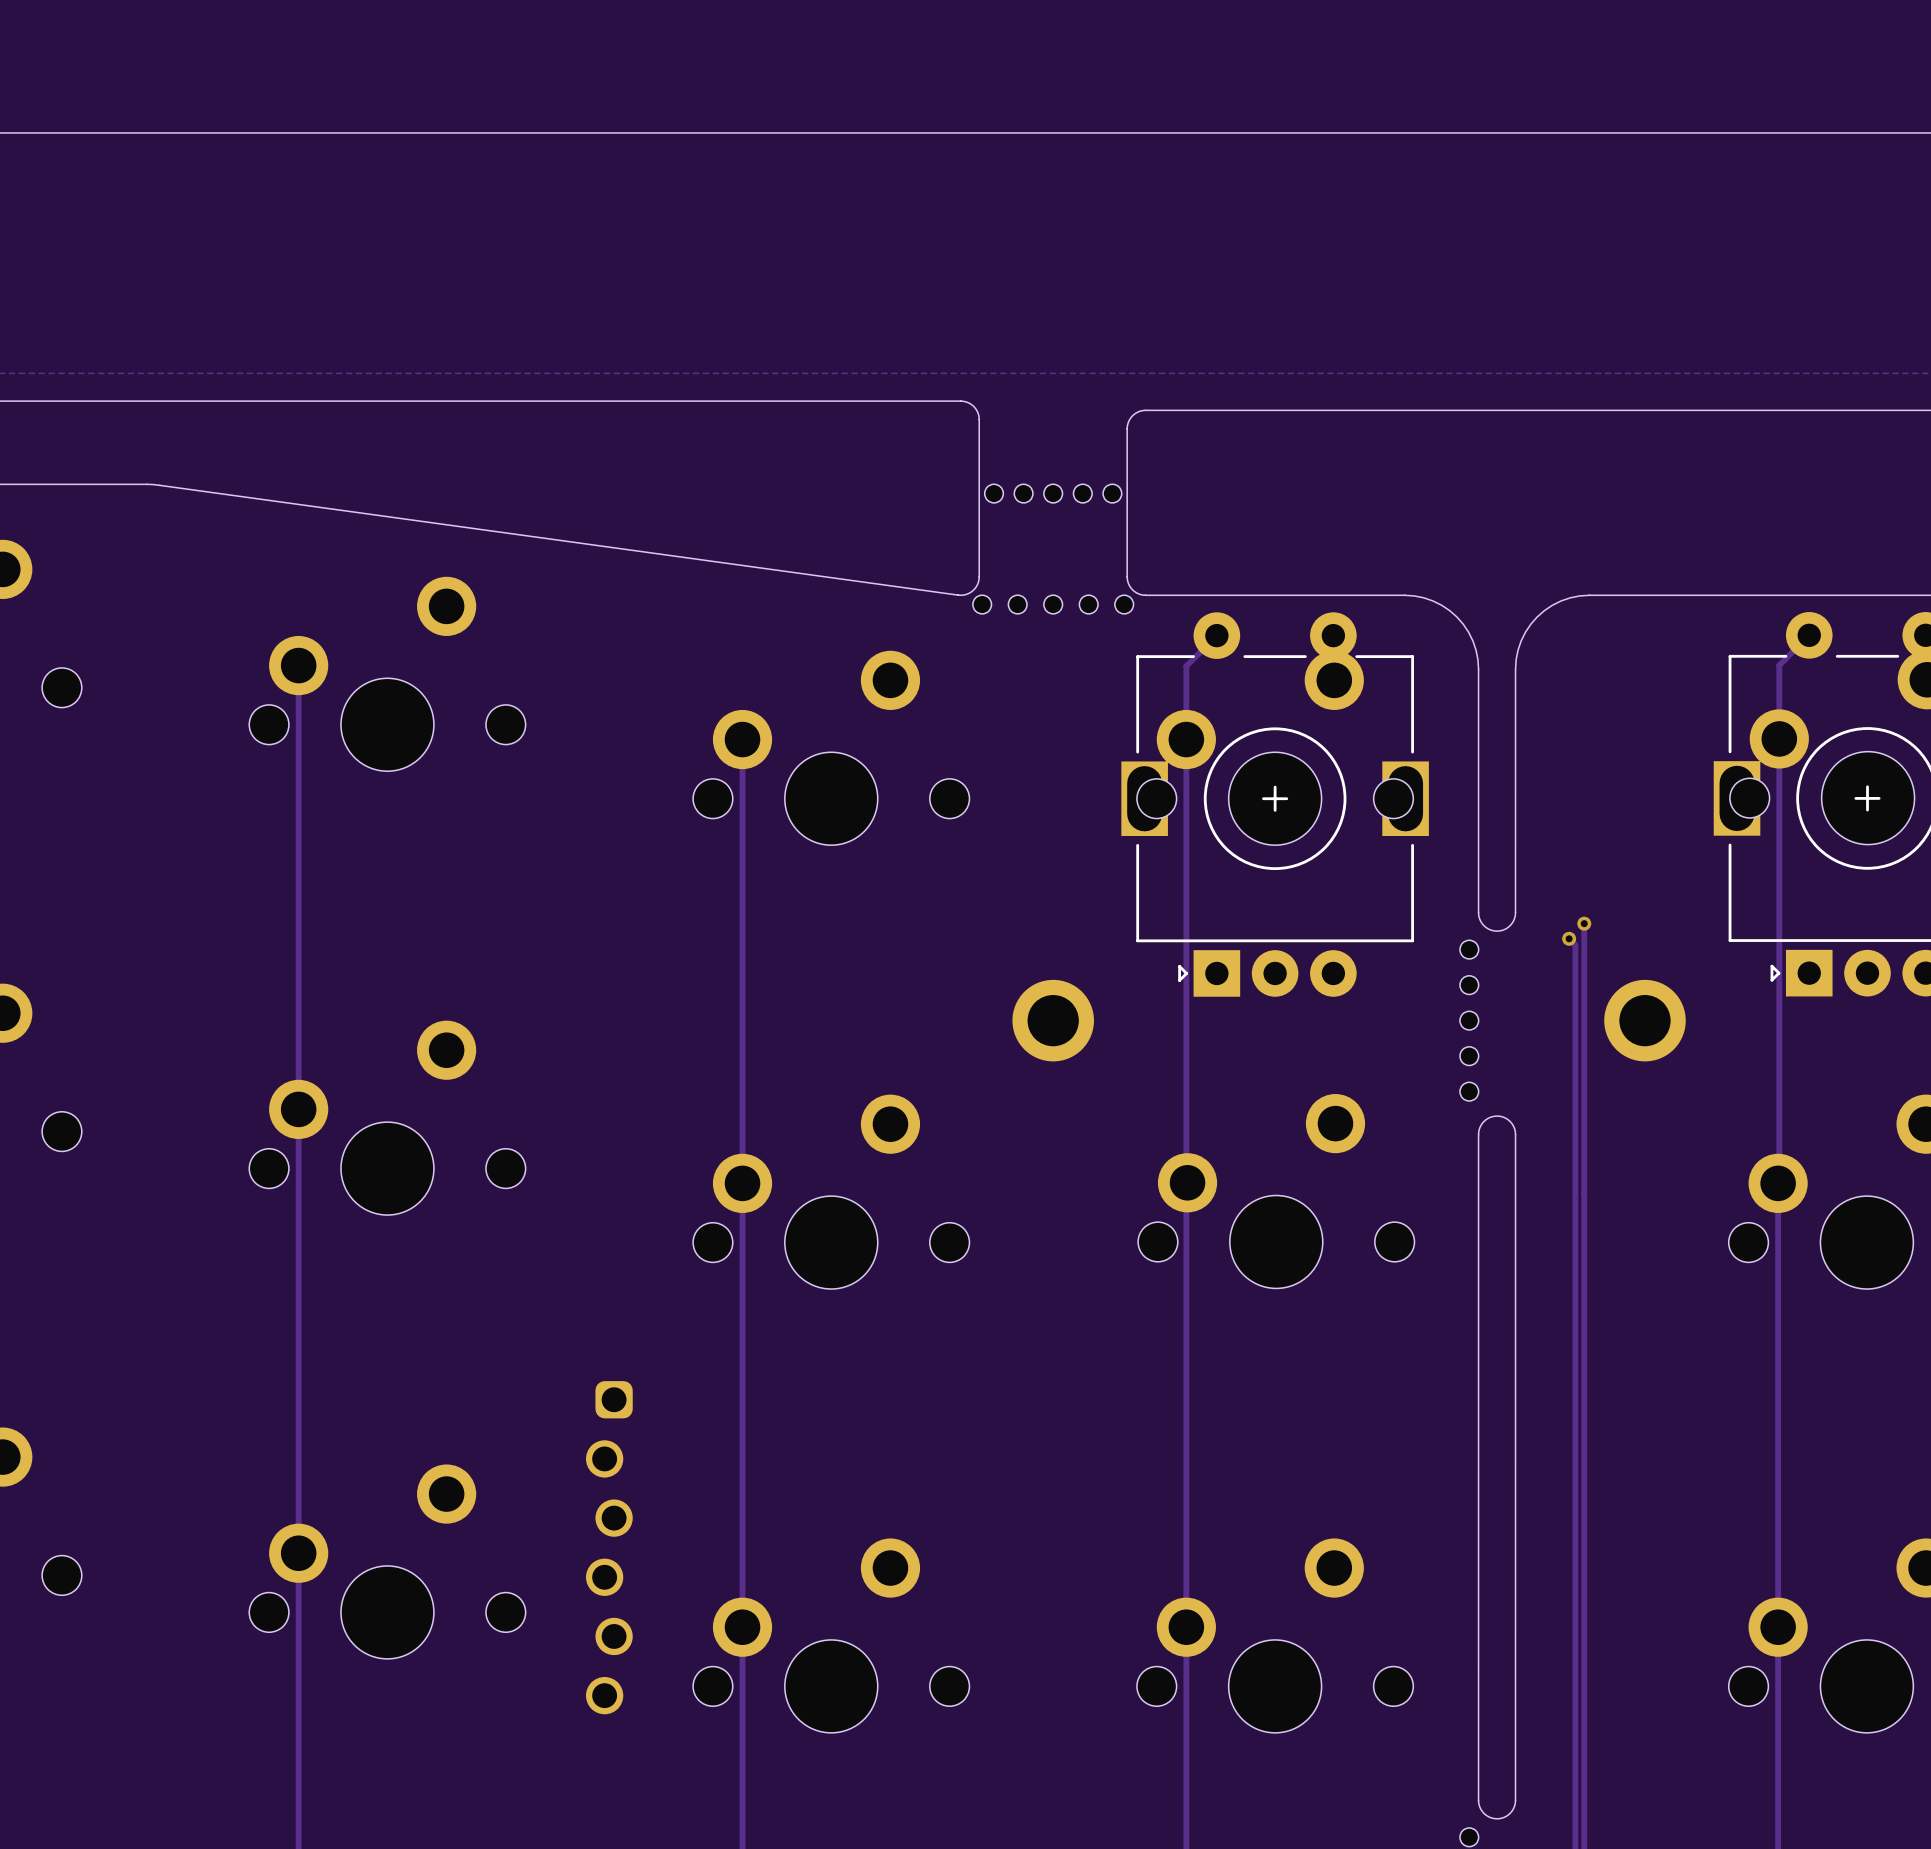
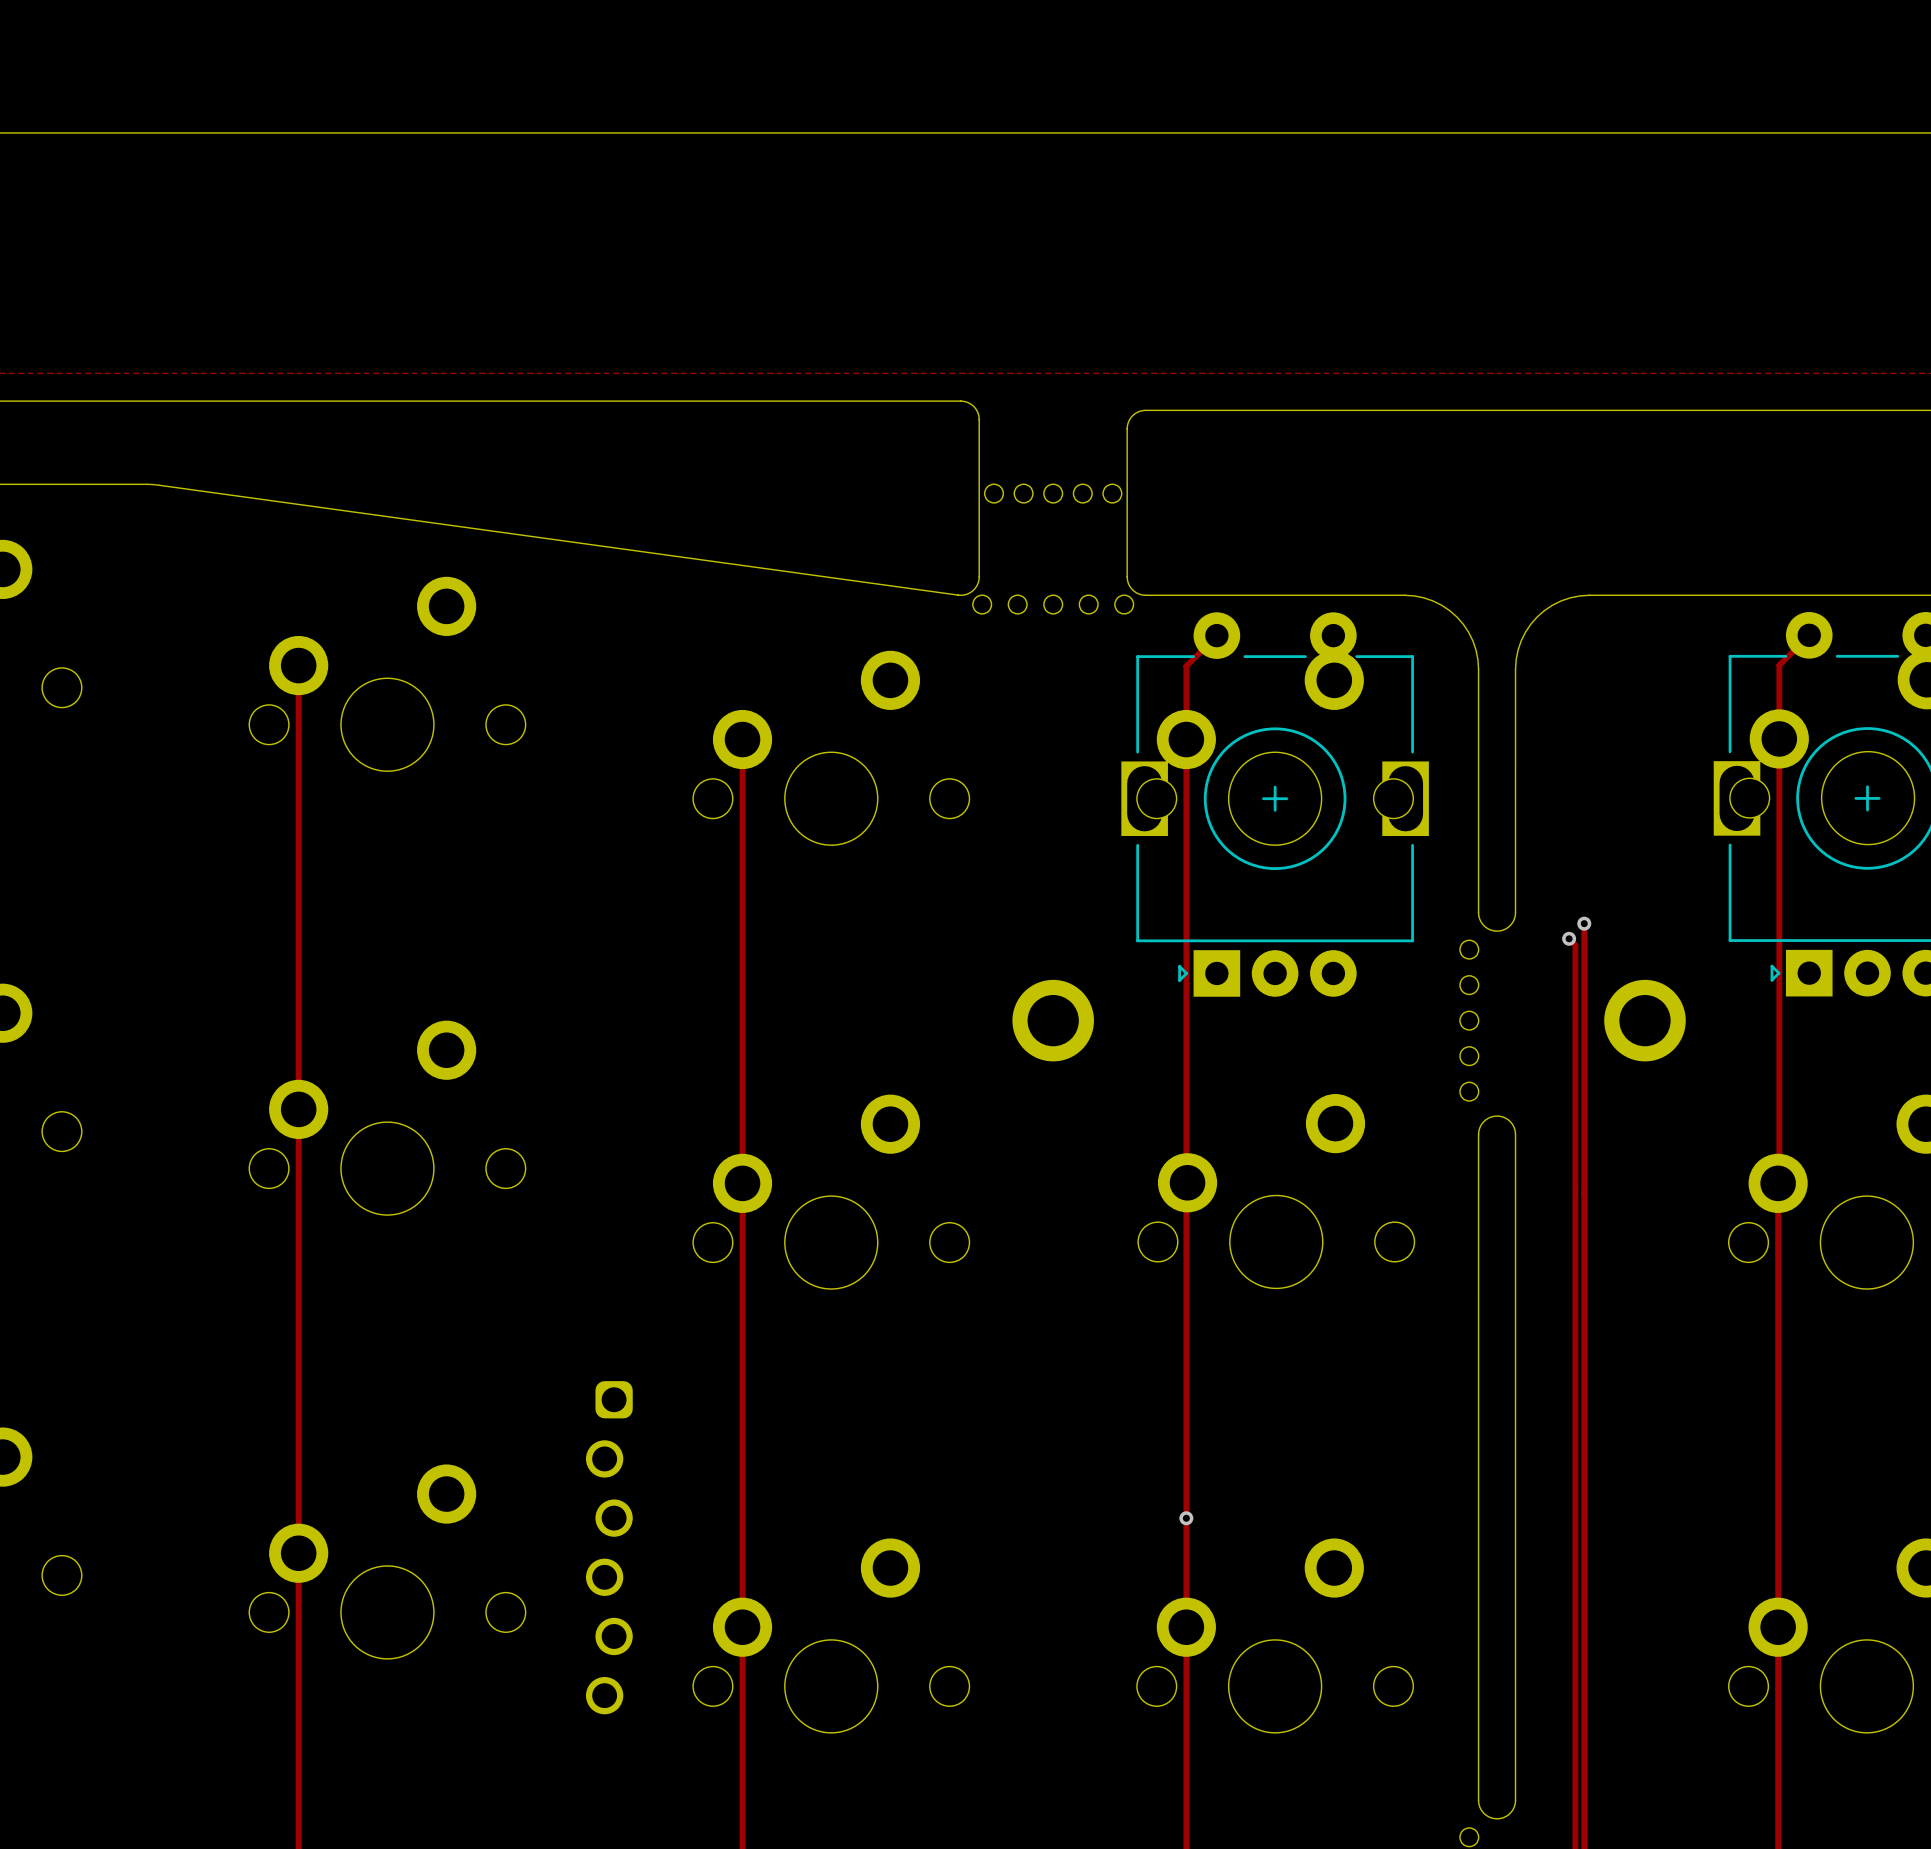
via: none -> (1186, 1518)

